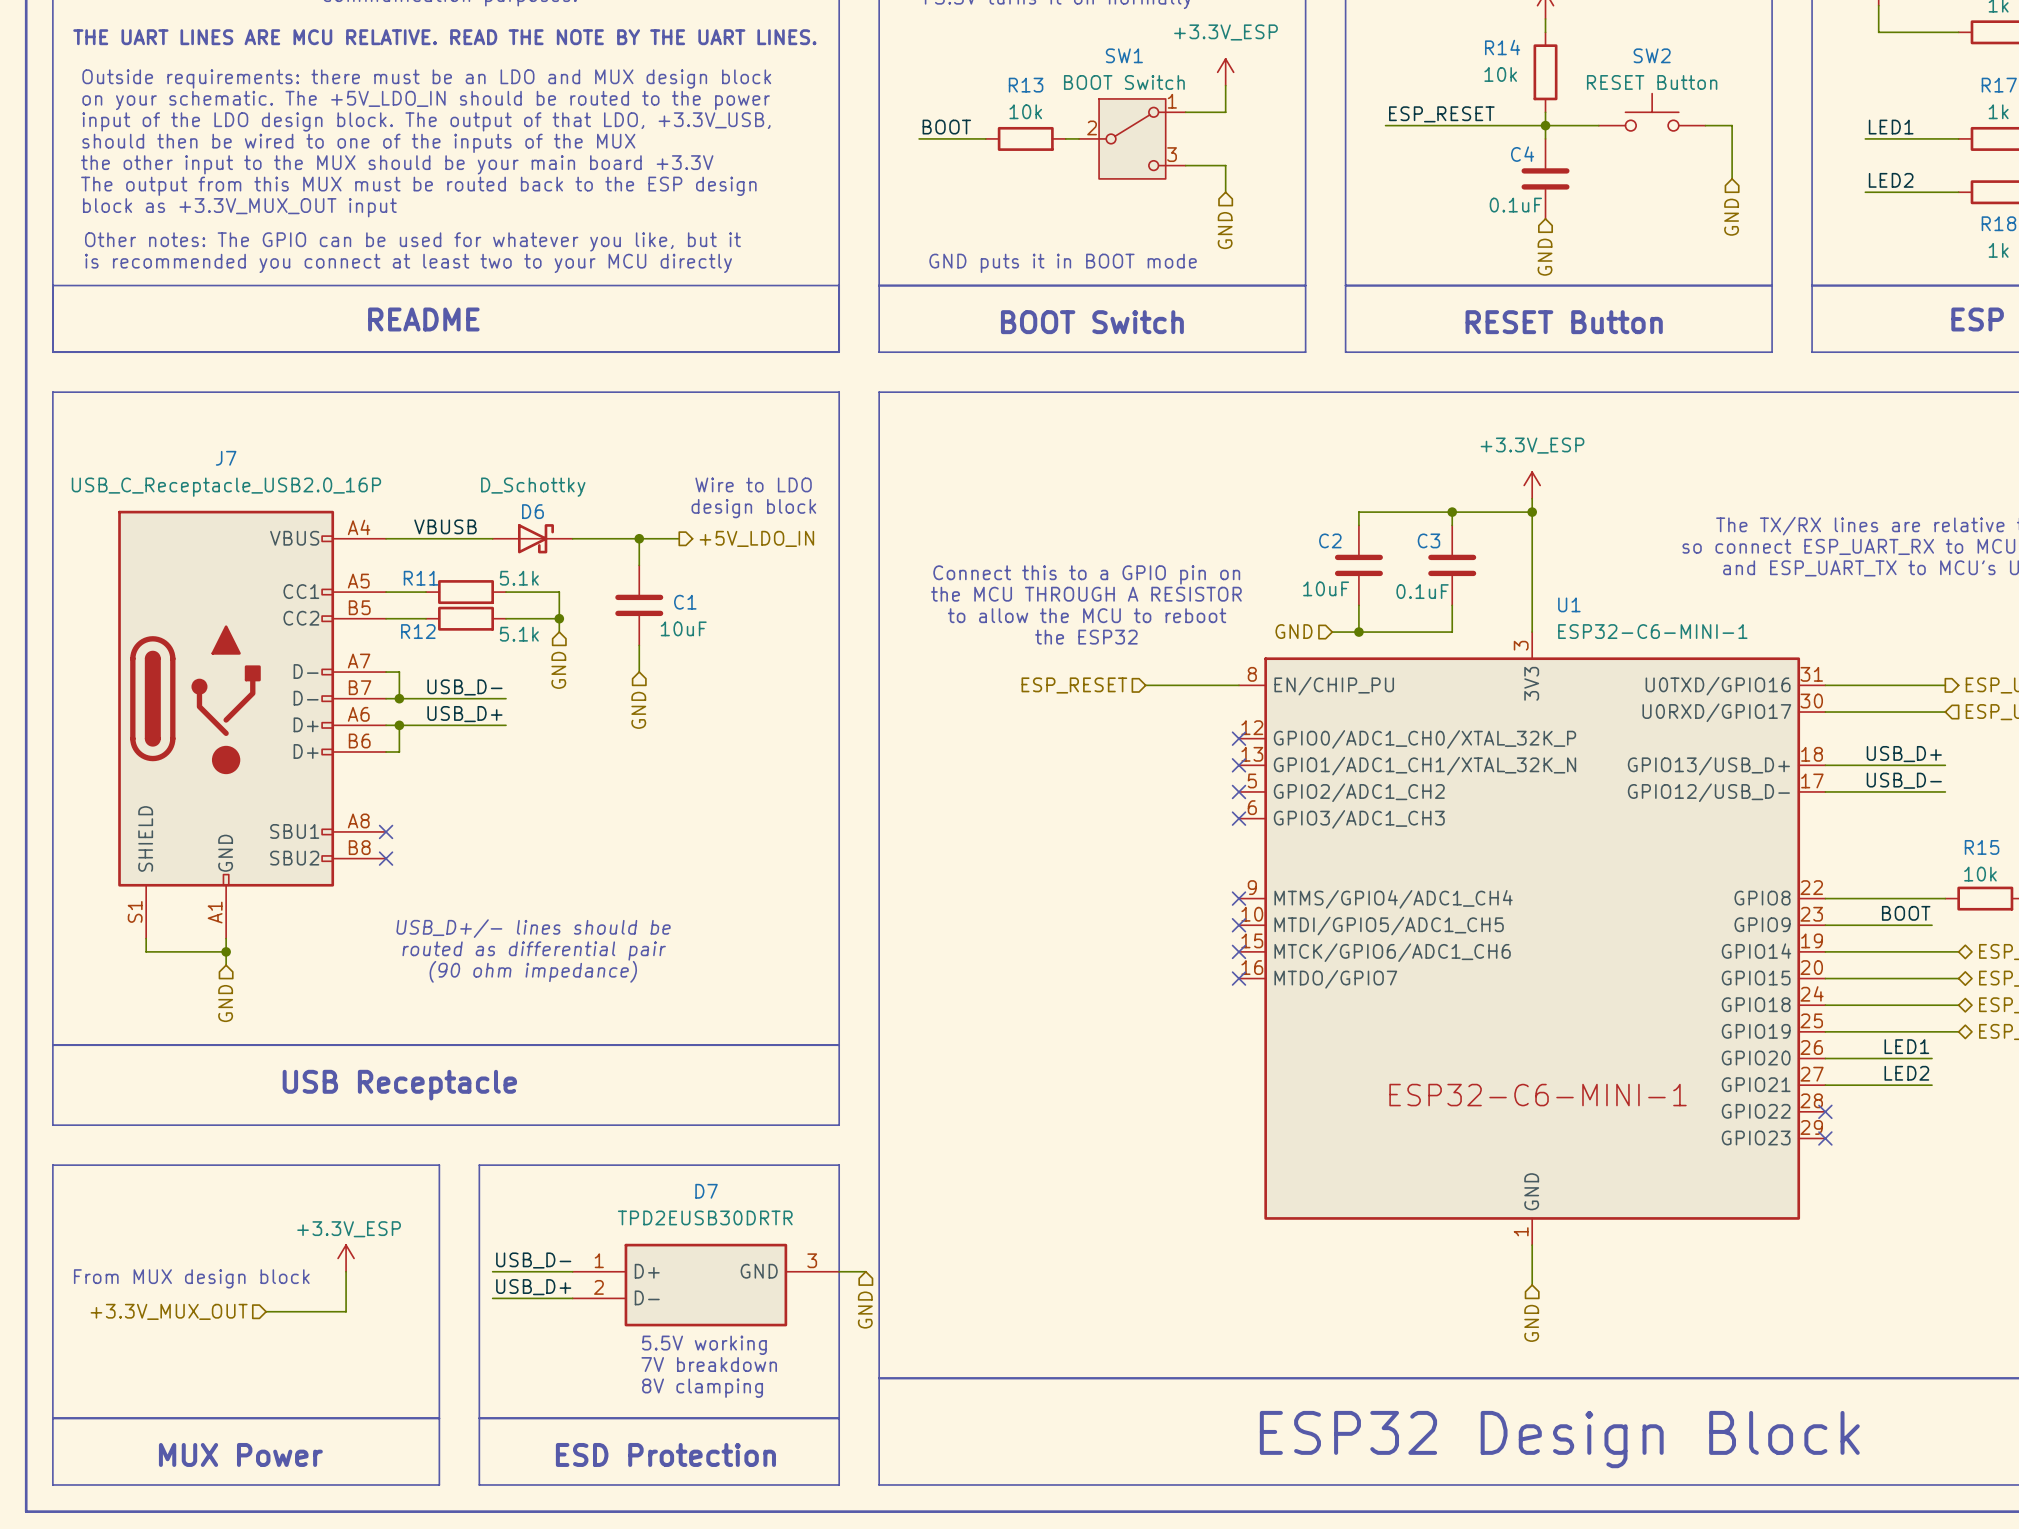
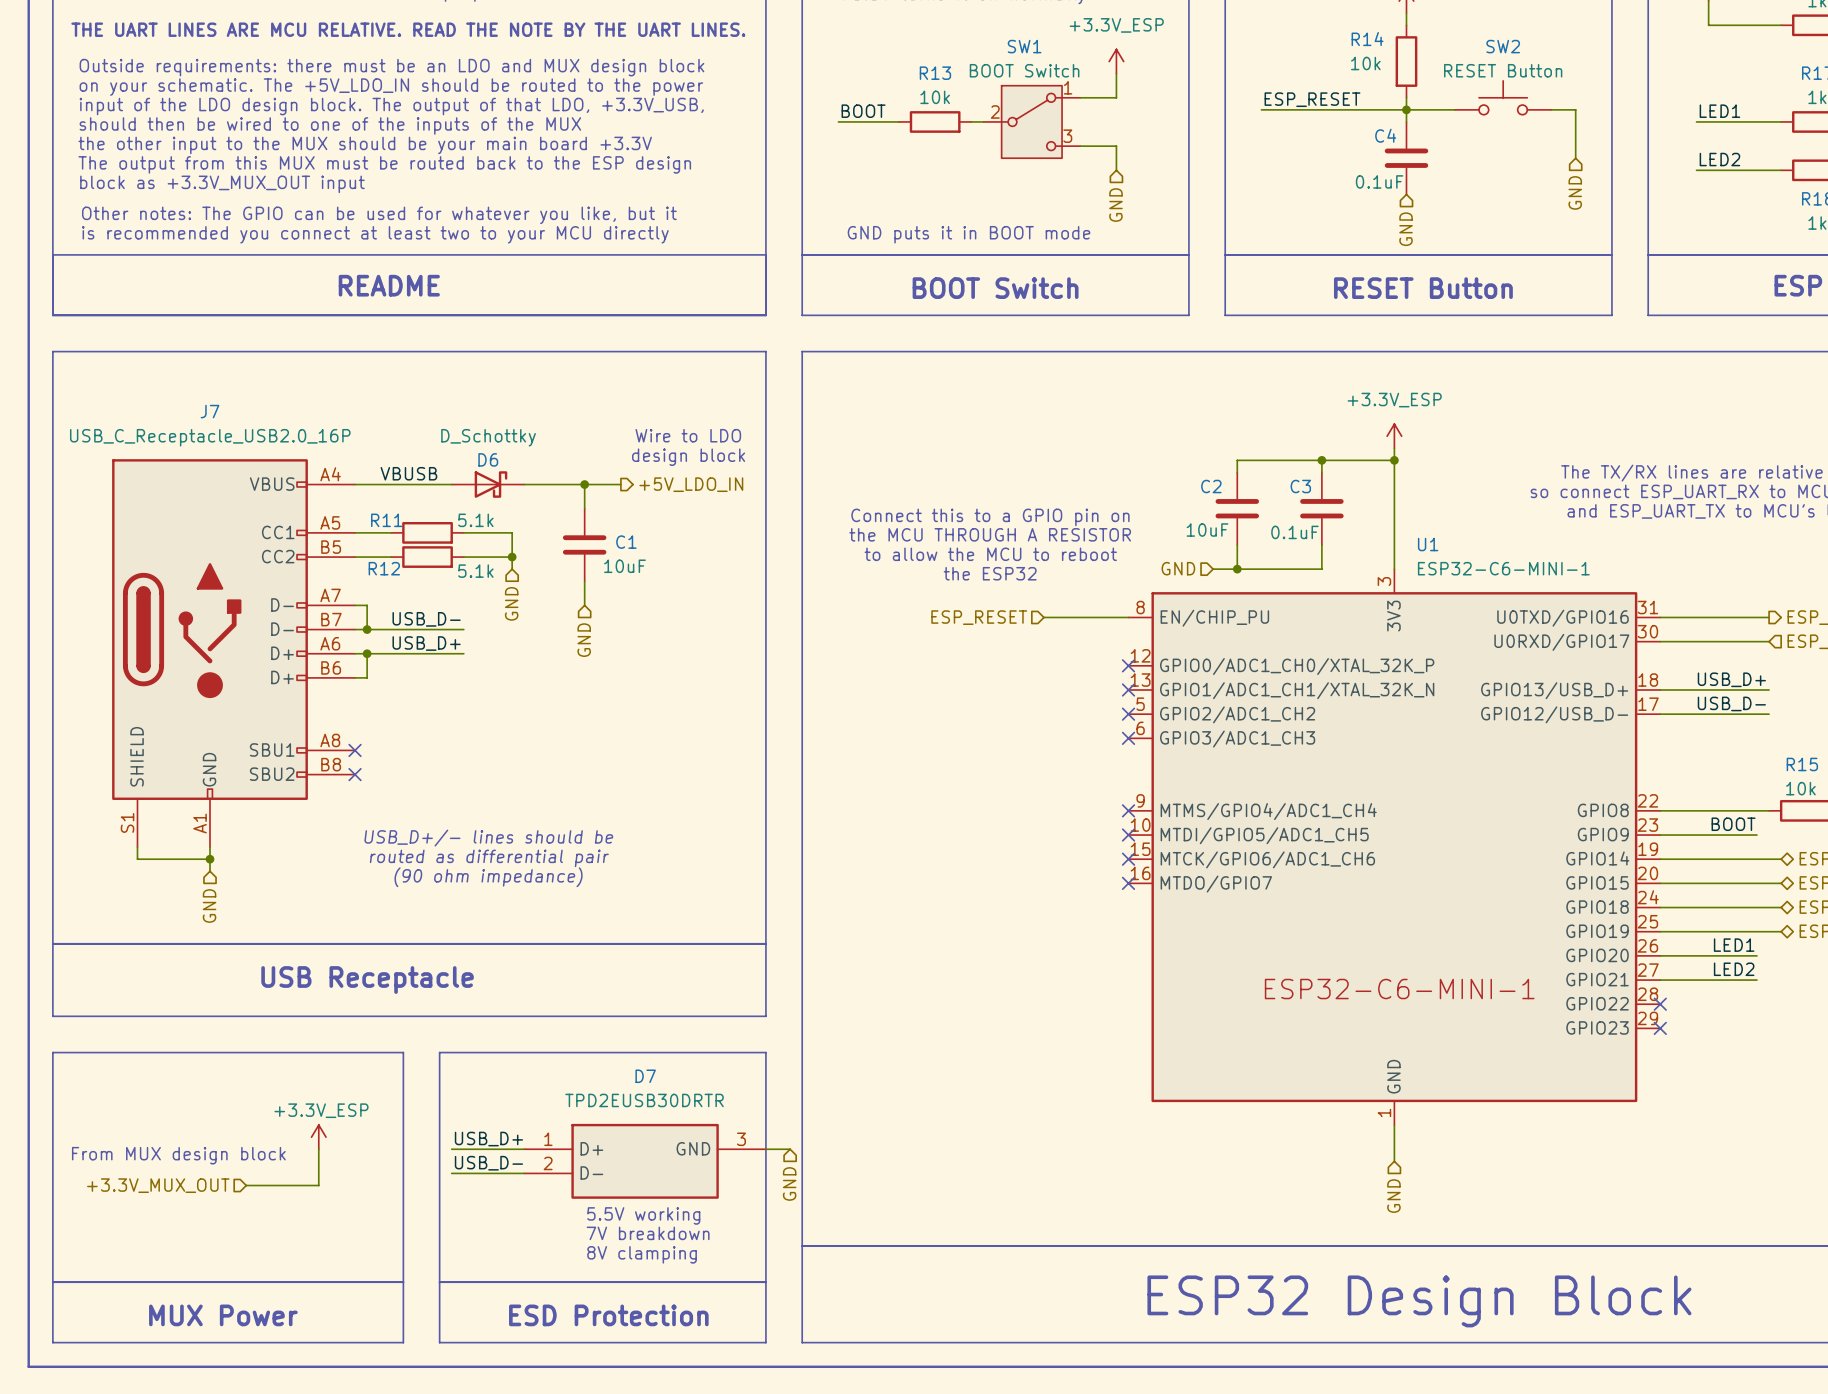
label: USB_D- (533, 1260) -> USB_D+ (488, 1139)
label: USB_D+ (533, 1287) -> USB_D- (488, 1163)

